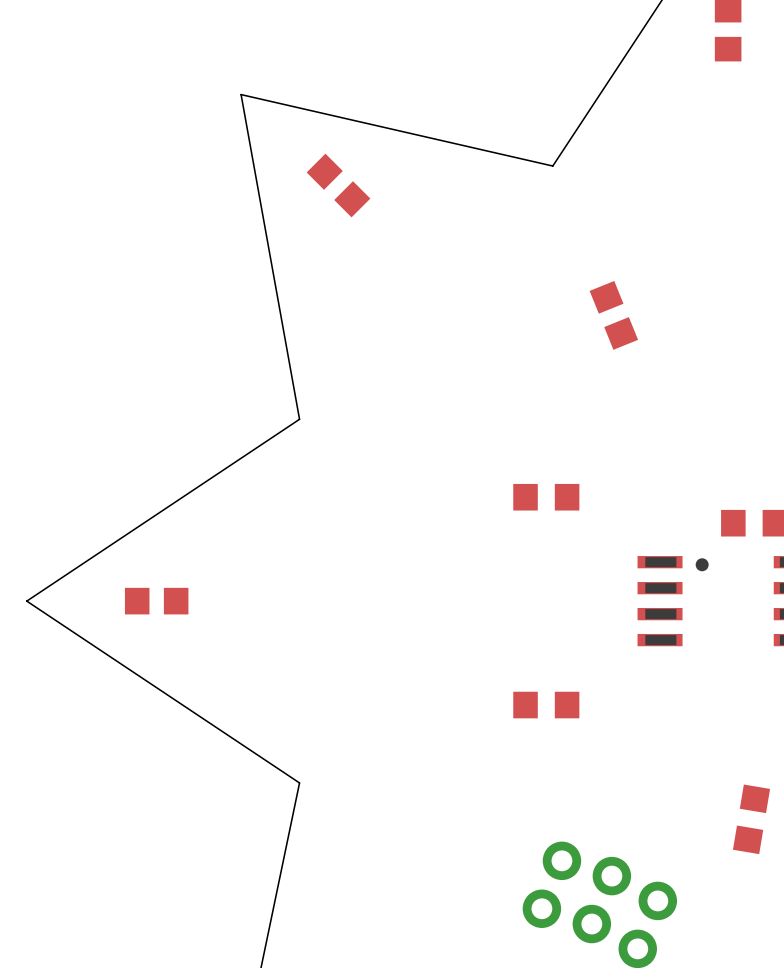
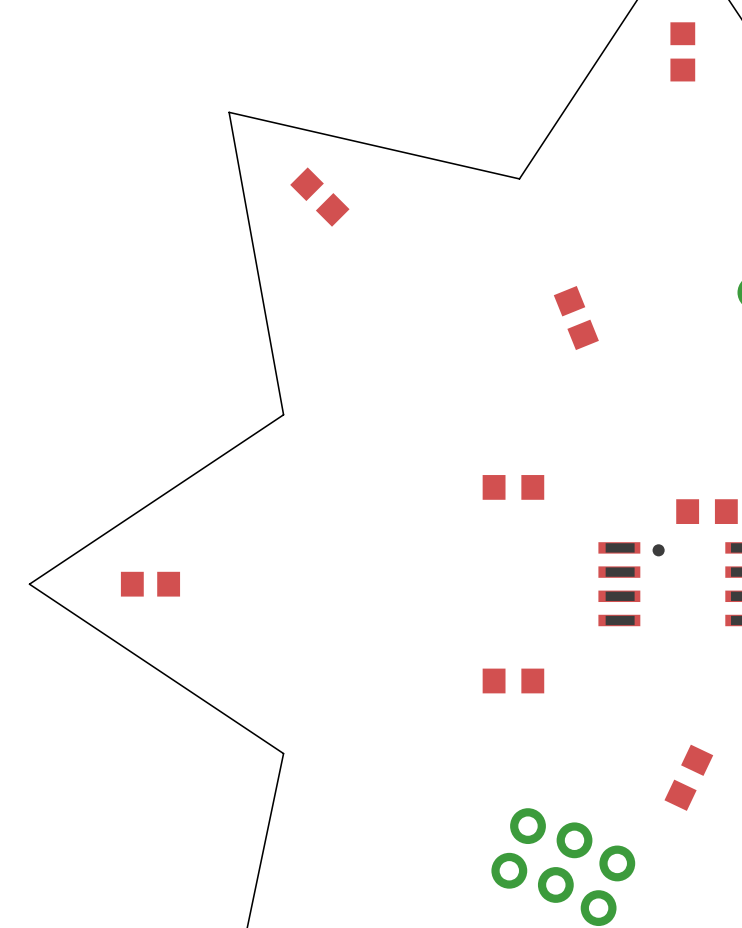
part rotation: 0° (751, 819) -> 15.9° clockwise (688, 777)

